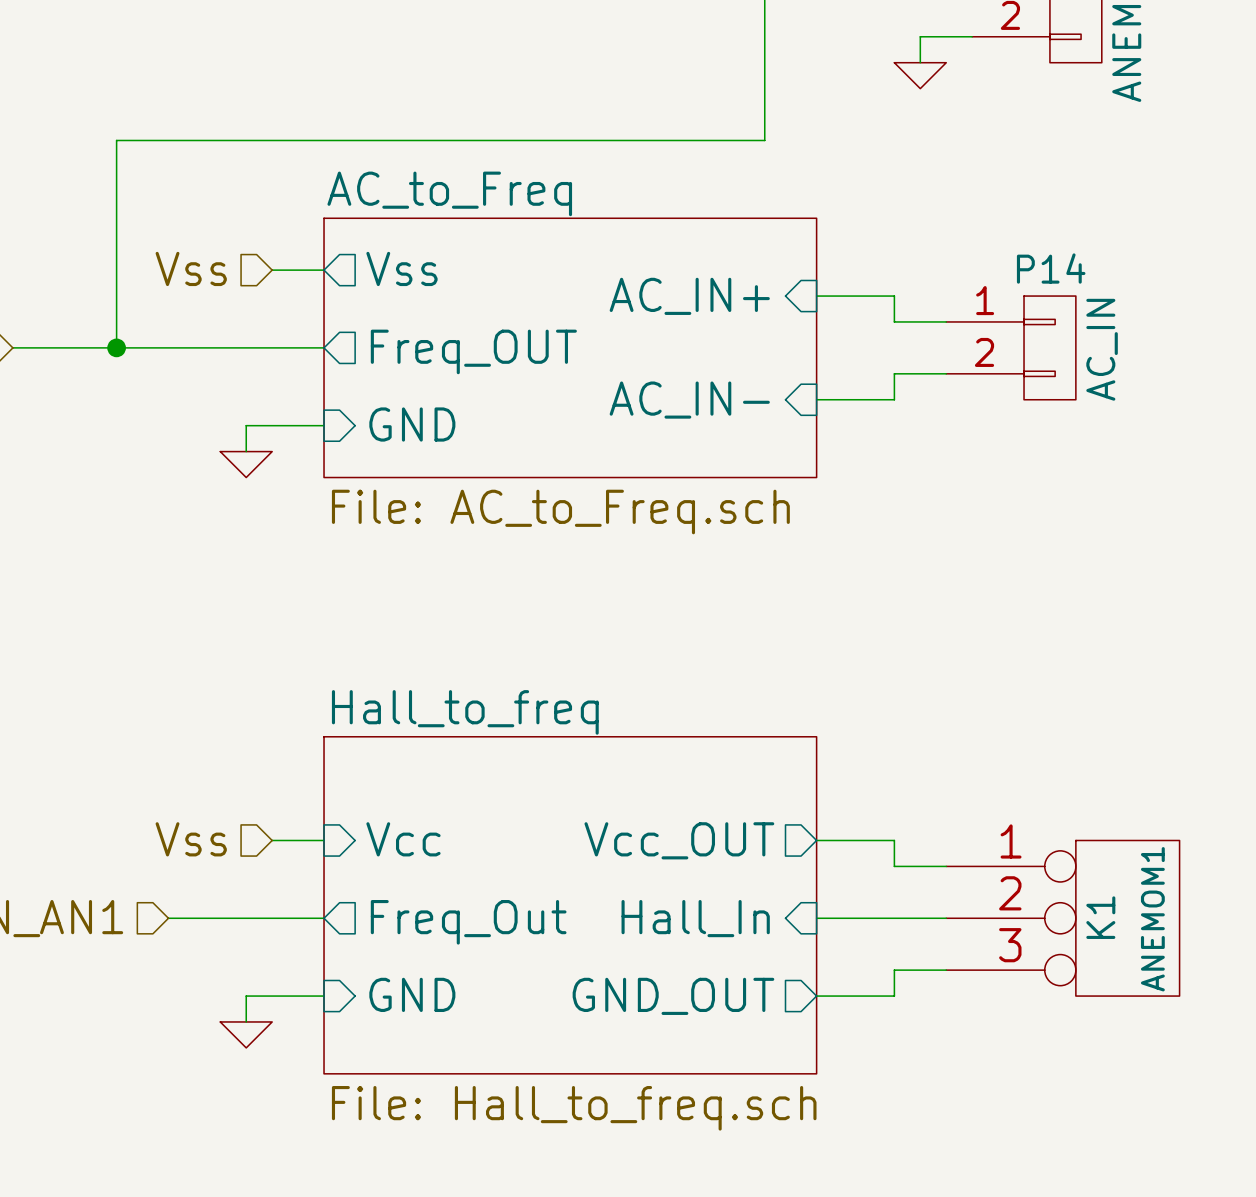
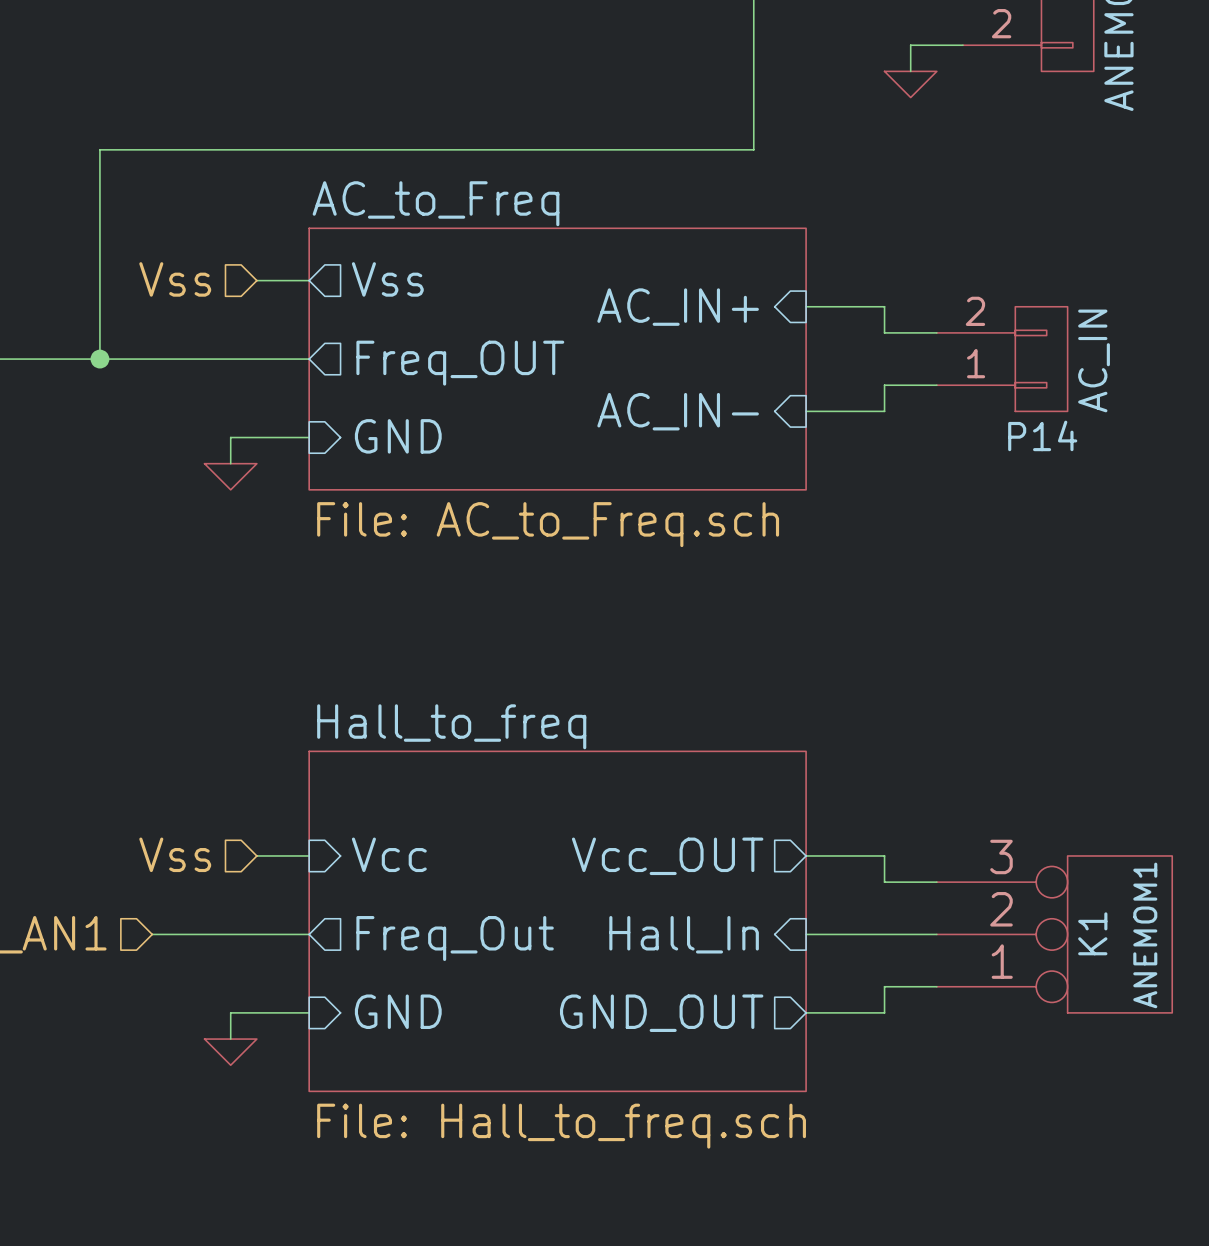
P14 flip: as is (1049, 347) -> up-down (1041, 359)
K1 flip: as is (1127, 918) -> up-down (1119, 934)

